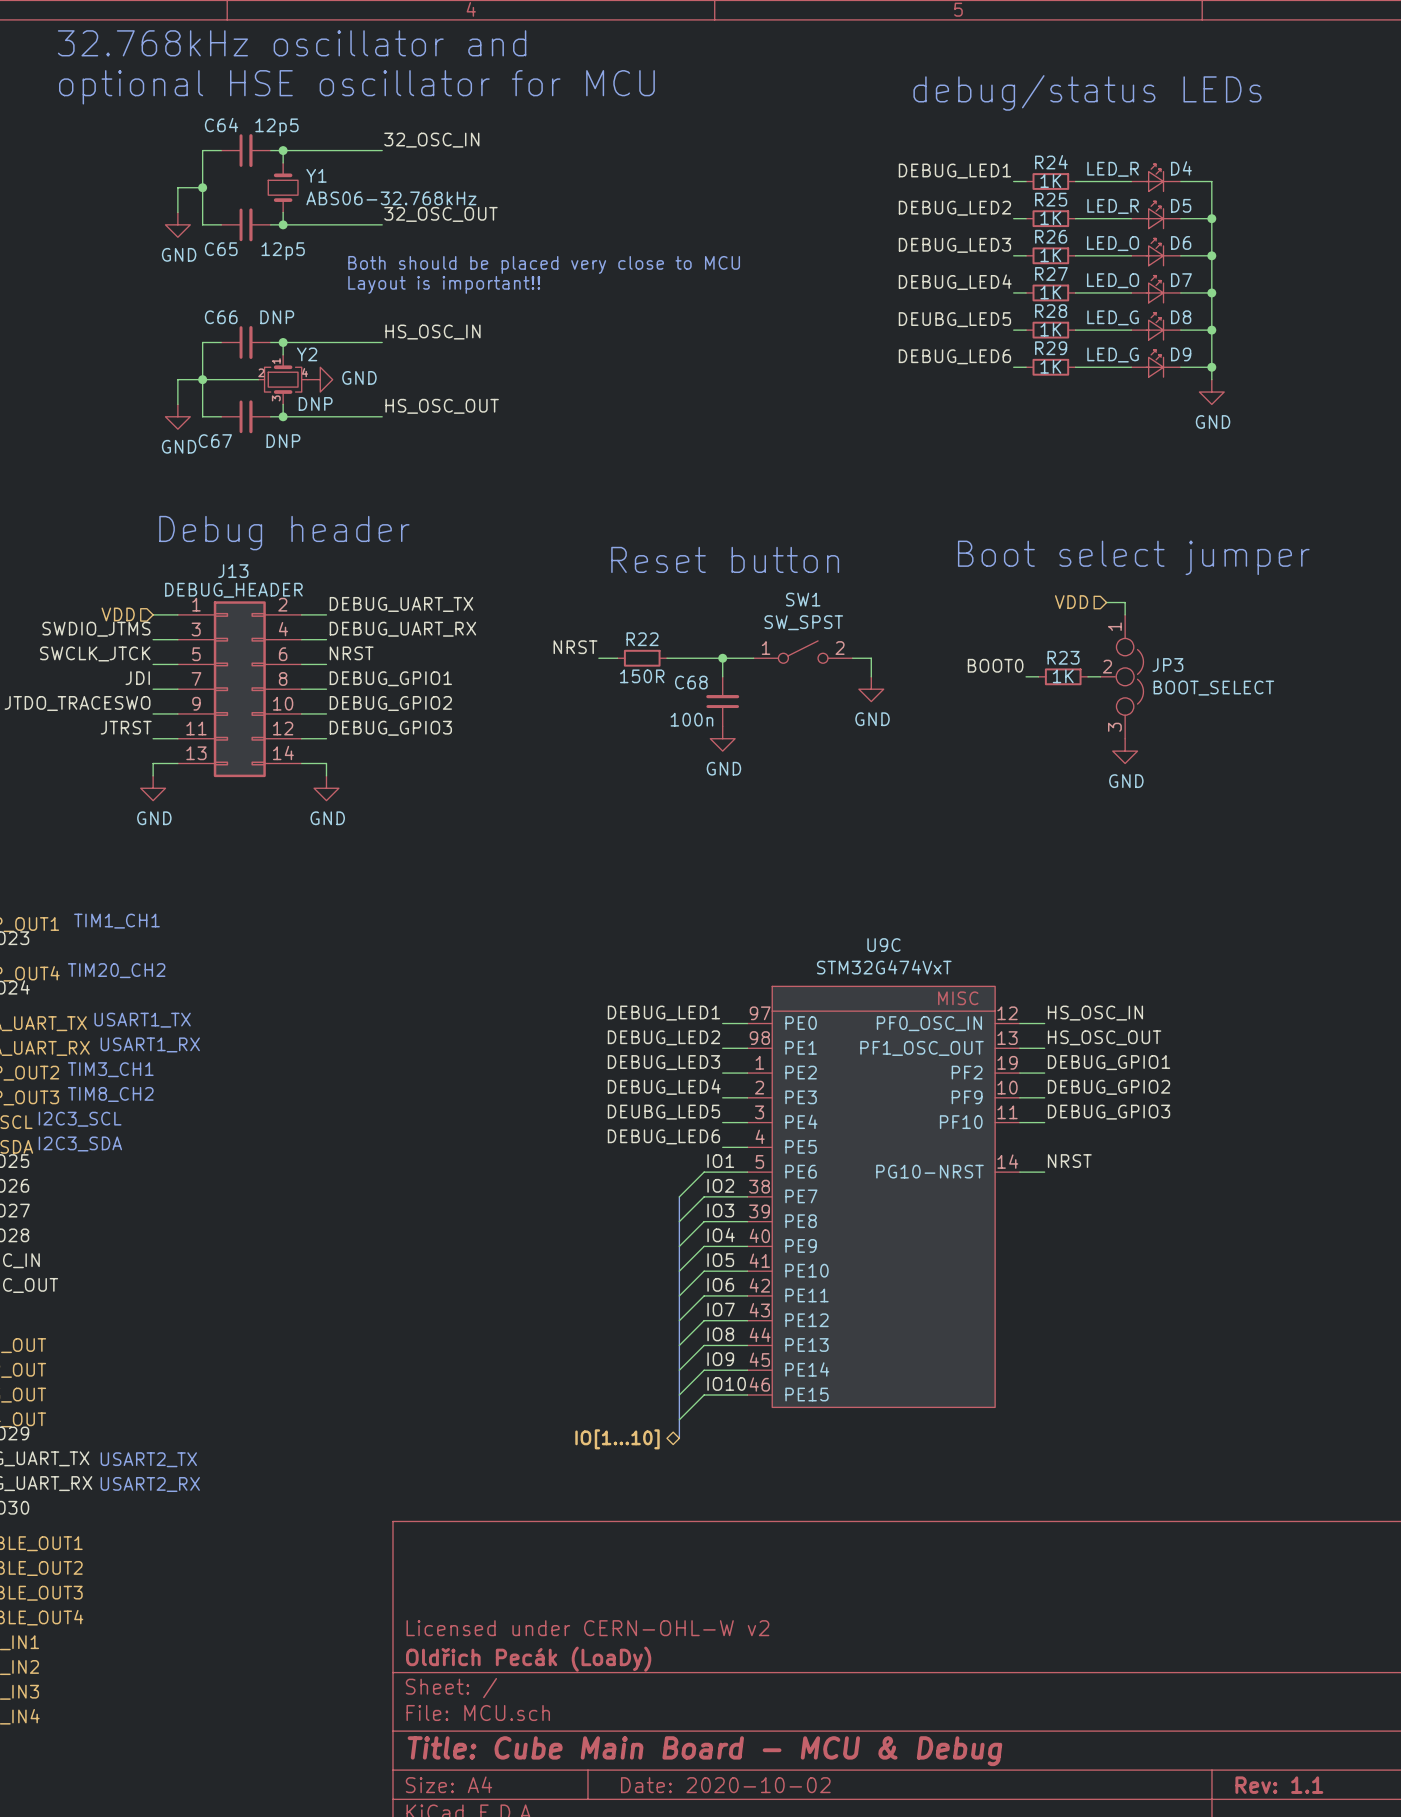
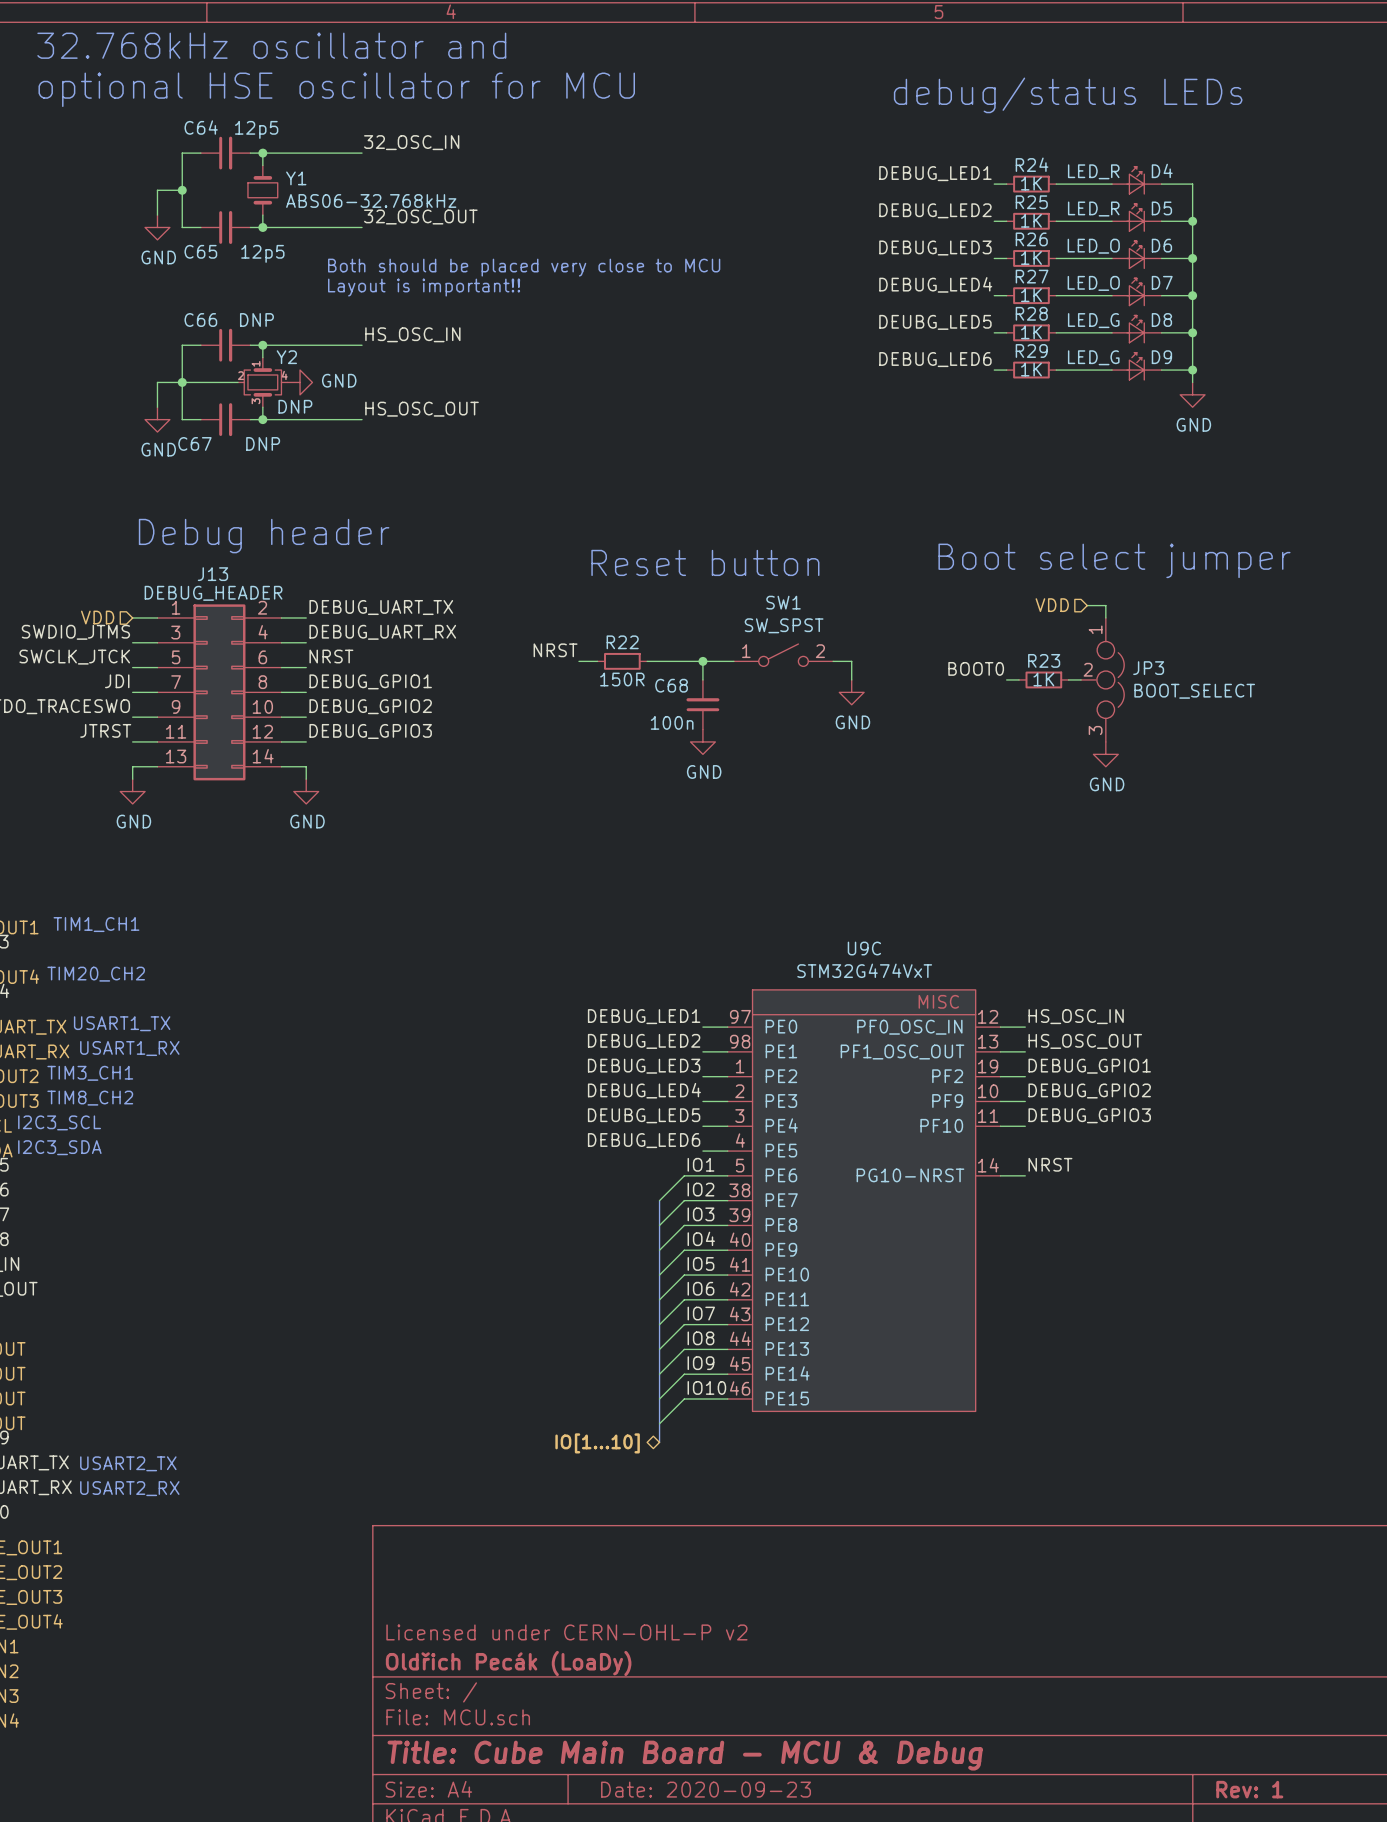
title block: Licensed under CERN-OHL-W v2 (587, 1628) -> Licensed under CERN-OHL-P v2 (566, 1632)
title block: Date: 2020-10-02 (725, 1785) -> Date: 2020-09-23 (706, 1789)
title block: Rev: 1.1 (1279, 1785) -> Rev: 1 (1249, 1789)

